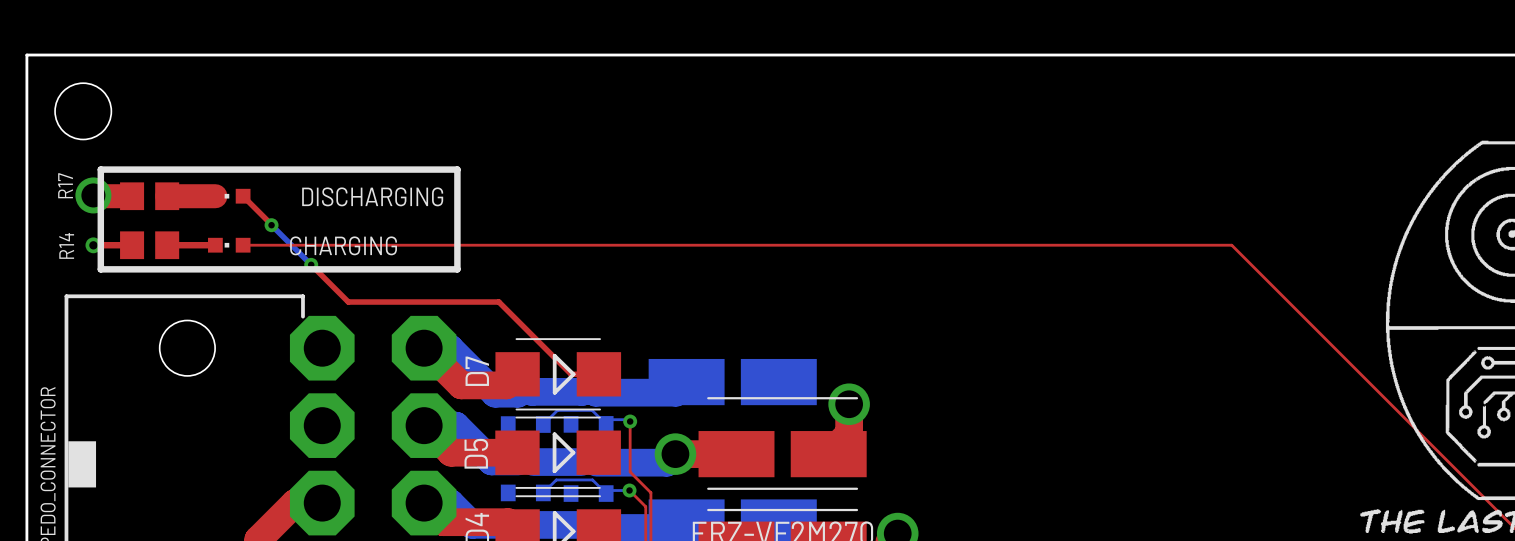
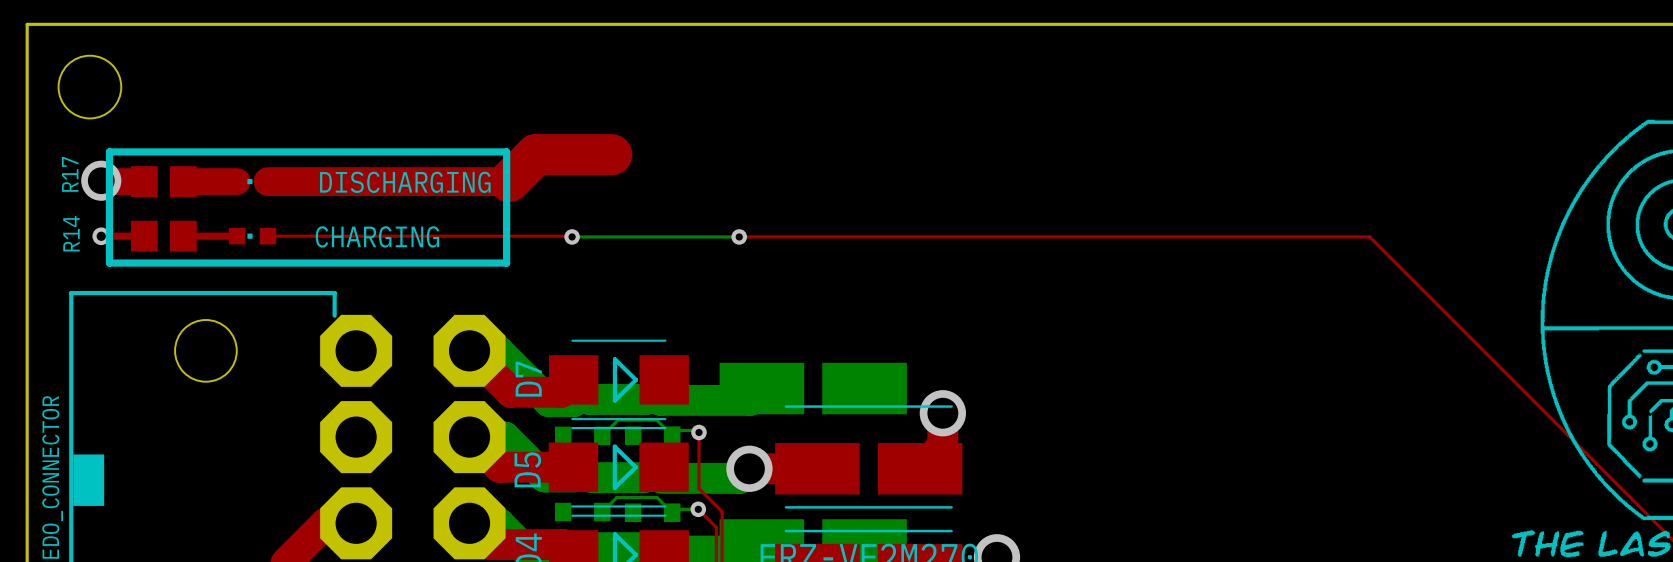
top track: (243, 196) (271, 225) -> (267, 181) (509, 181) (535, 154) (611, 154)
bottom track: (271, 225) (311, 264) -> none
via: (271, 225) -> none
top track: (515, 245) (1232, 245) -> (739, 236) (1369, 236)
bottom track: none -> (572, 236) (739, 236)
via: none -> (572, 236)
via: none -> (739, 236)
top track: (311, 264) (348, 302) (498, 302) (571, 374) (598, 374) -> none
via: (311, 264) -> none

